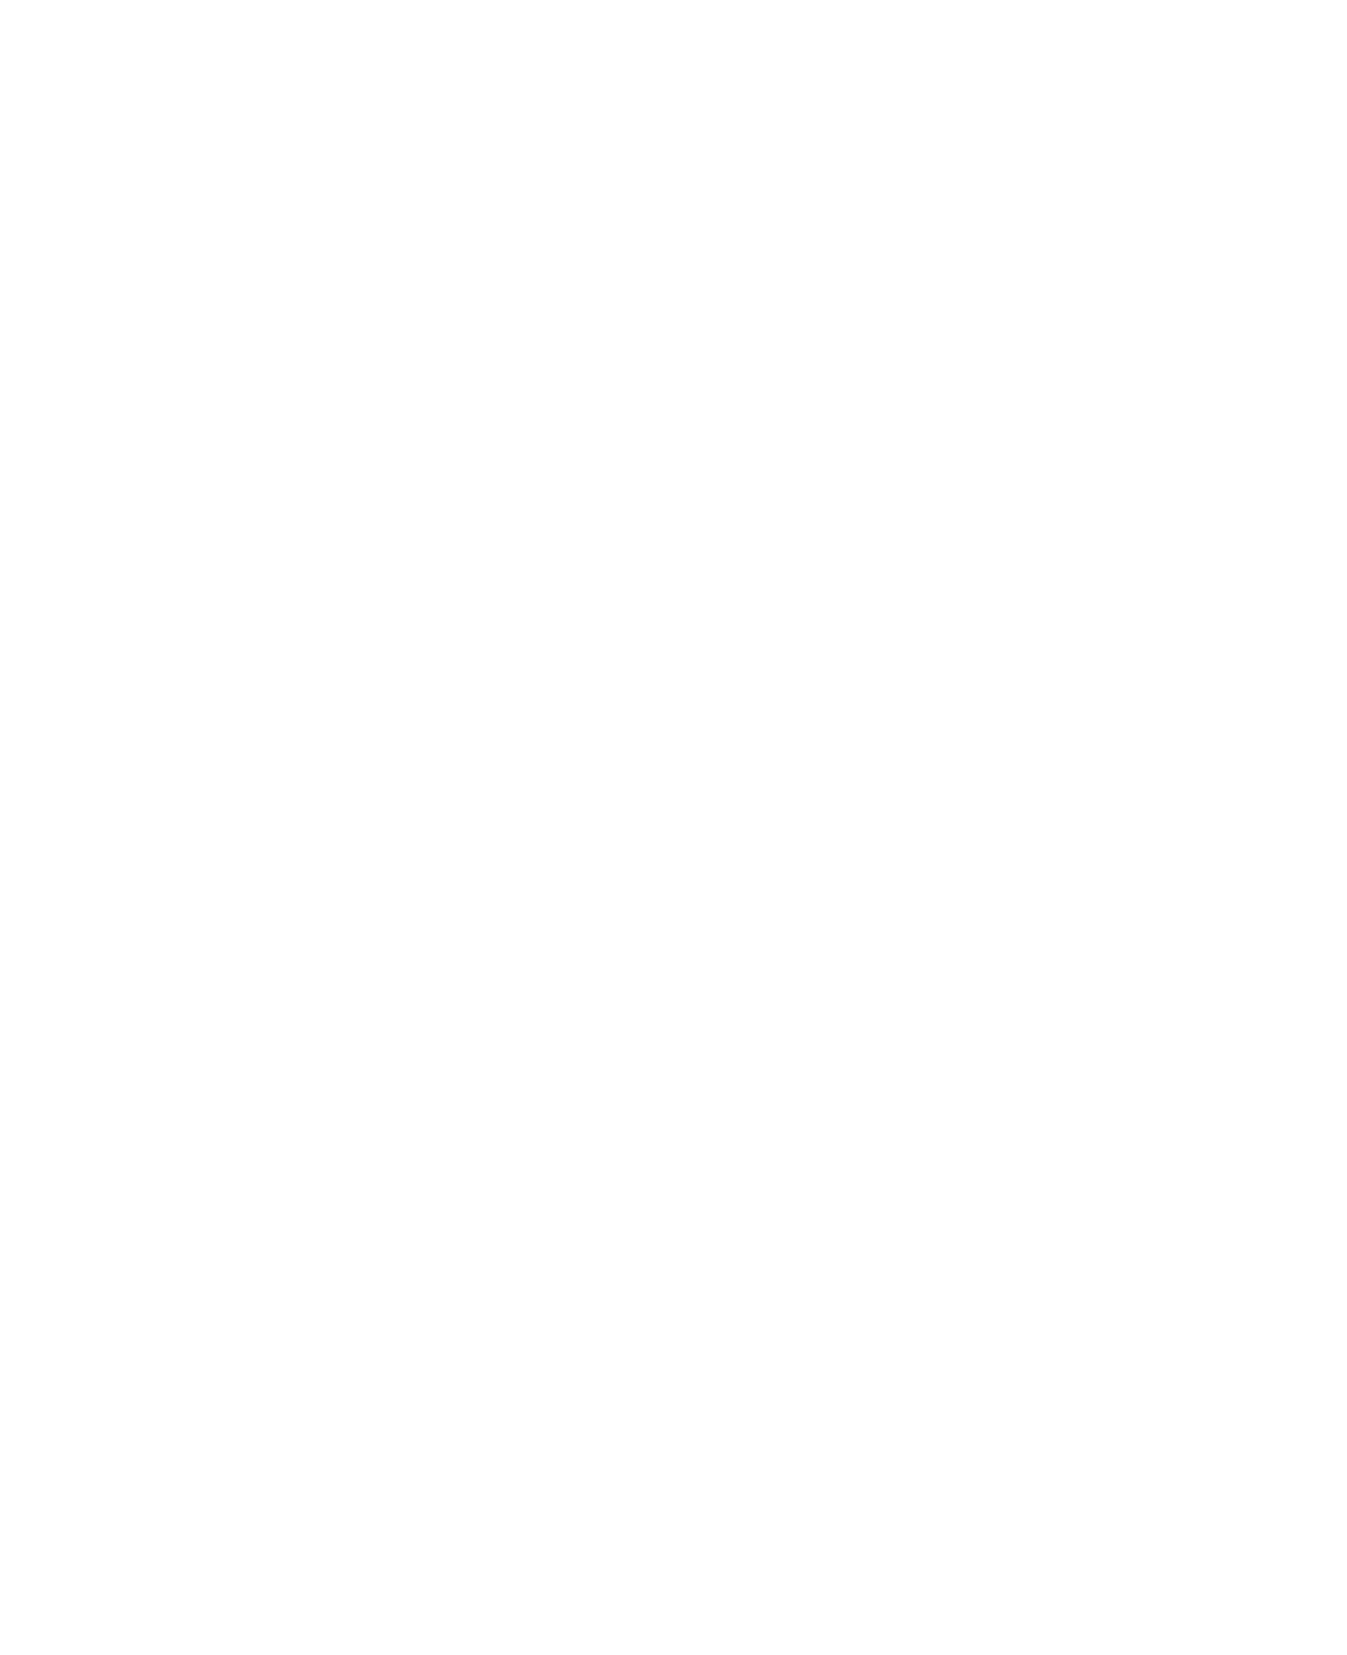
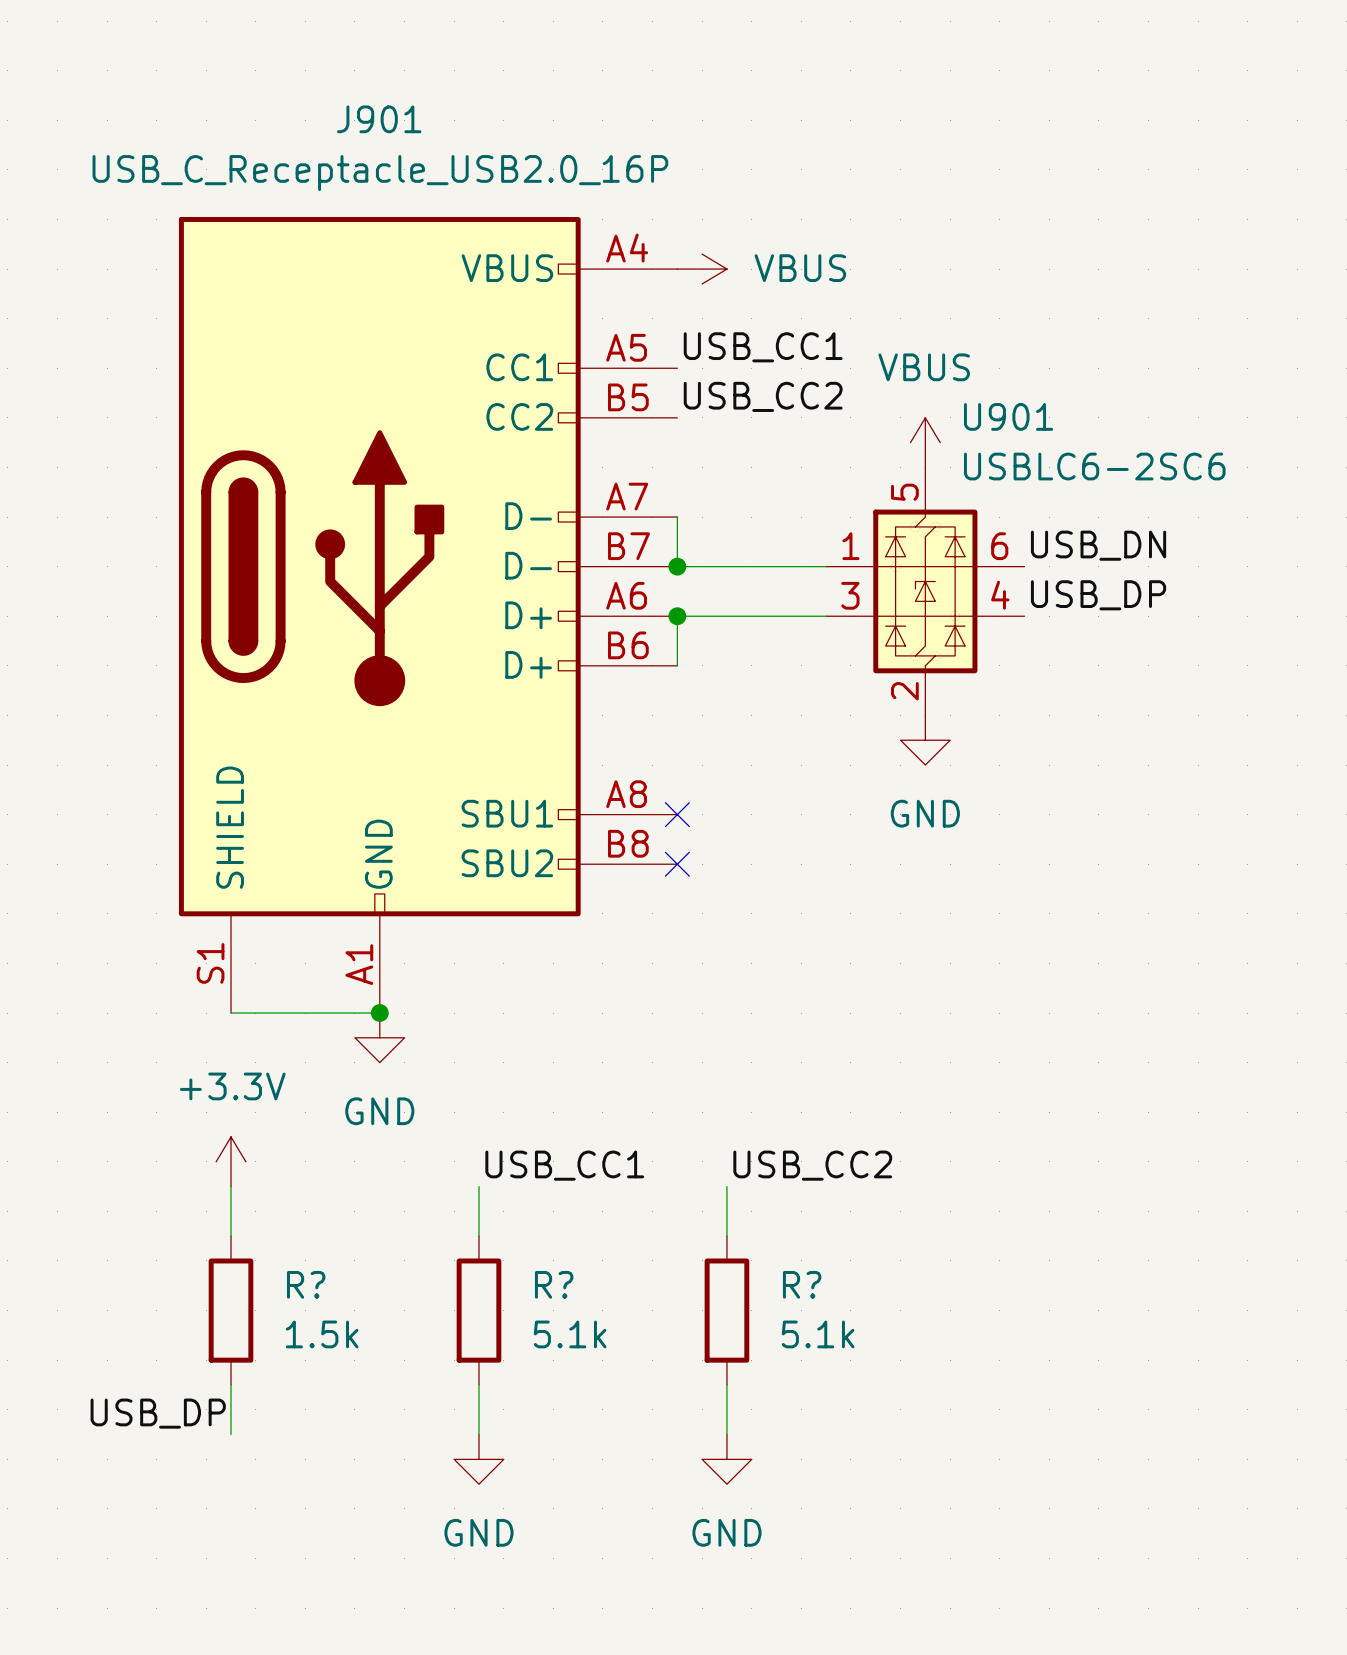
power symbol: none -> VBUS (702, 269)
label: none -> USB_CC1 (763, 347)
label: none -> USB_CC2 (763, 396)
power symbol: none -> VBUS (925, 442)
wire: none -> (677, 517) (677, 566) (826, 566)
label: none -> USB_DN (1098, 545)
junction: none -> (677, 566)
U901: none -> USBLC6-2SC6 (925, 591)
label: none -> USB_DP (1098, 595)
J901: none -> USB_C_Receptacle_USB2.0_16P (428, 614)
junction: none -> (677, 616)
wire: none -> (826, 616) (677, 616) (677, 665)
power symbol: none -> GND (925, 740)
no-connect mark: none -> (677, 814)
no-connect mark: none -> (677, 864)
wire: none -> (231, 1013) (379, 1013)
junction: none -> (379, 1013)
power symbol: none -> GND (379, 1037)
power symbol: none -> +3.3V (231, 1161)
label: none -> USB_CC1 (564, 1165)
label: none -> USB_CC2 (812, 1165)
wire: none -> (231, 1186) (231, 1236)
wire: none -> (478, 1186) (478, 1236)
wire: none -> (726, 1186) (726, 1236)
R?: none -> 1.5k (231, 1310)
R?: none -> 5.1k (478, 1310)
R?: none -> 5.1k (726, 1310)
wire: none -> (231, 1384) (231, 1434)
wire: none -> (478, 1384) (478, 1434)
wire: none -> (726, 1384) (726, 1434)
label: none -> USB_DP (158, 1413)
power symbol: none -> GND (478, 1459)
power symbol: none -> GND (726, 1459)

